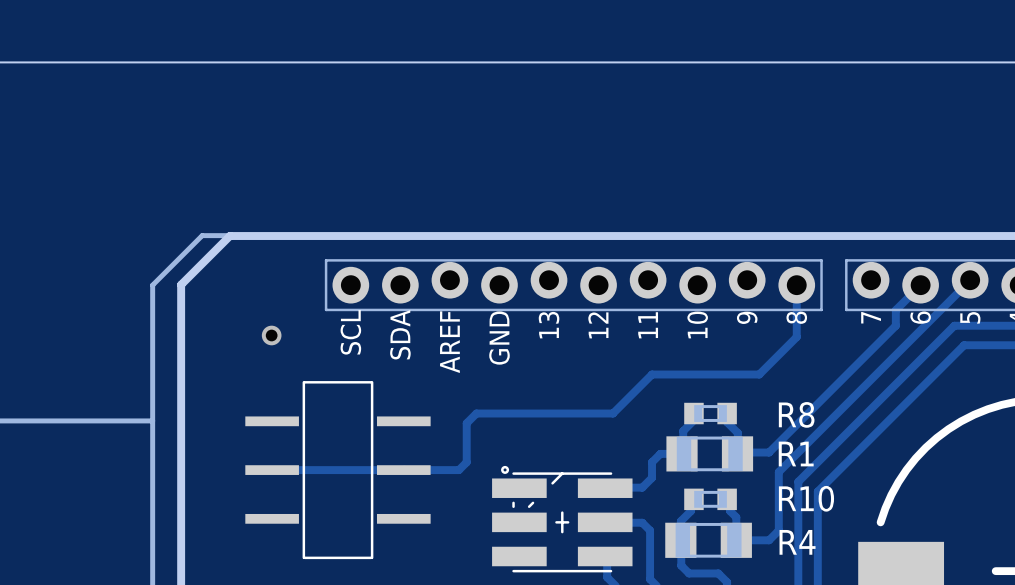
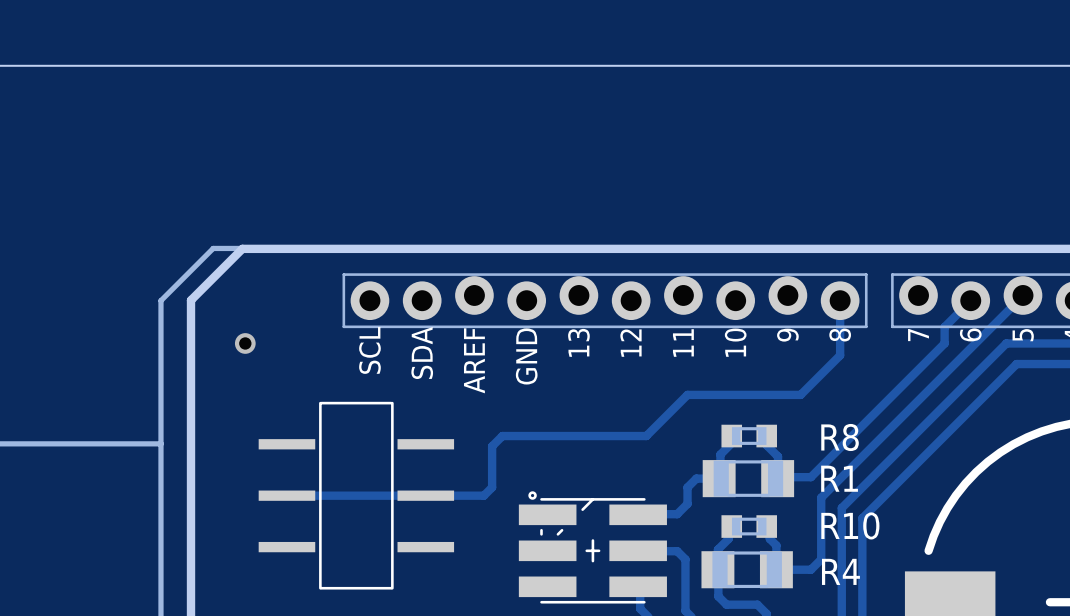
via position: (271, 335) -> (245, 343)

